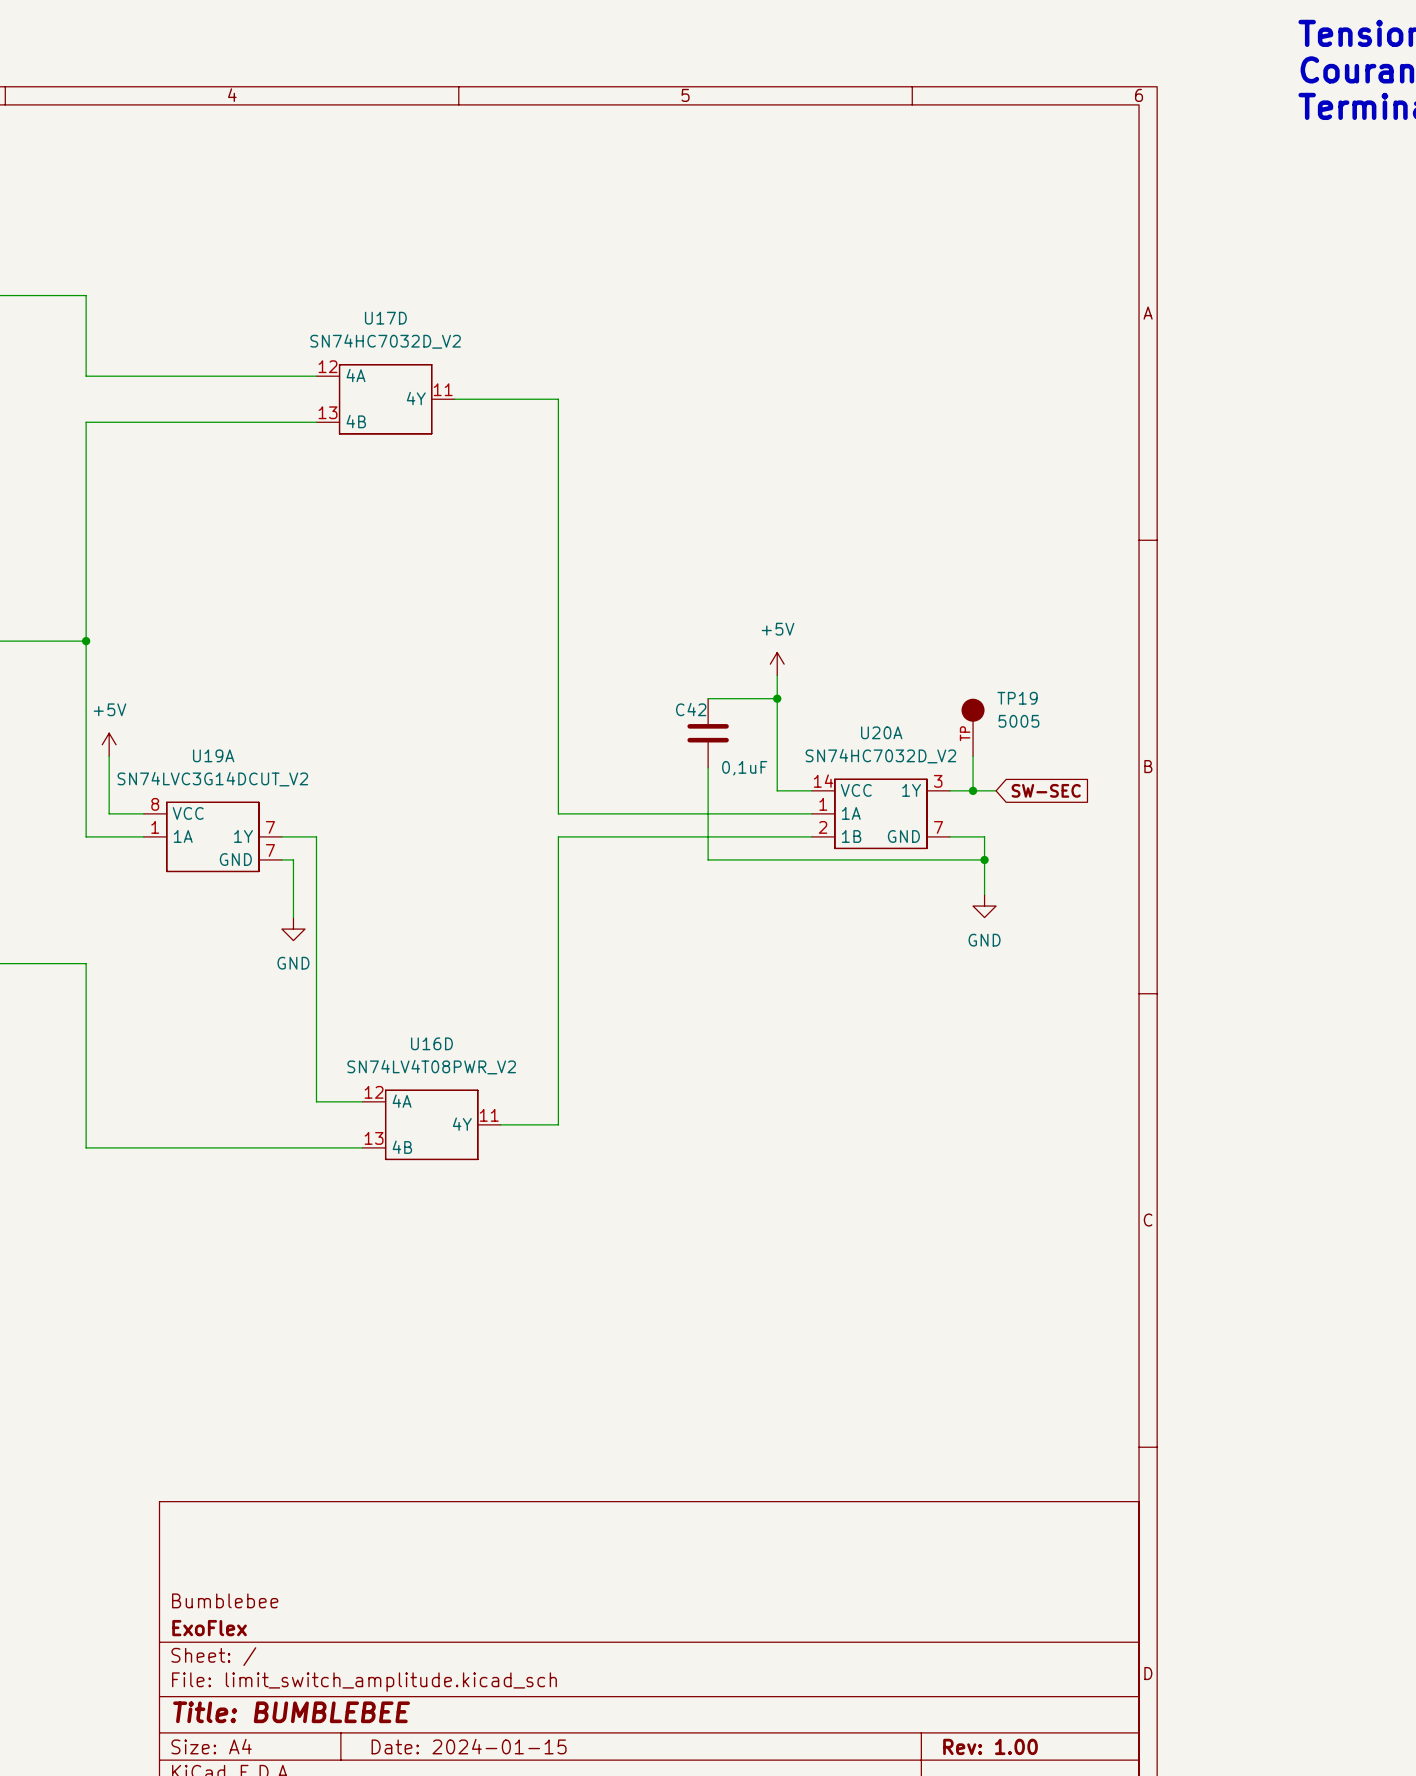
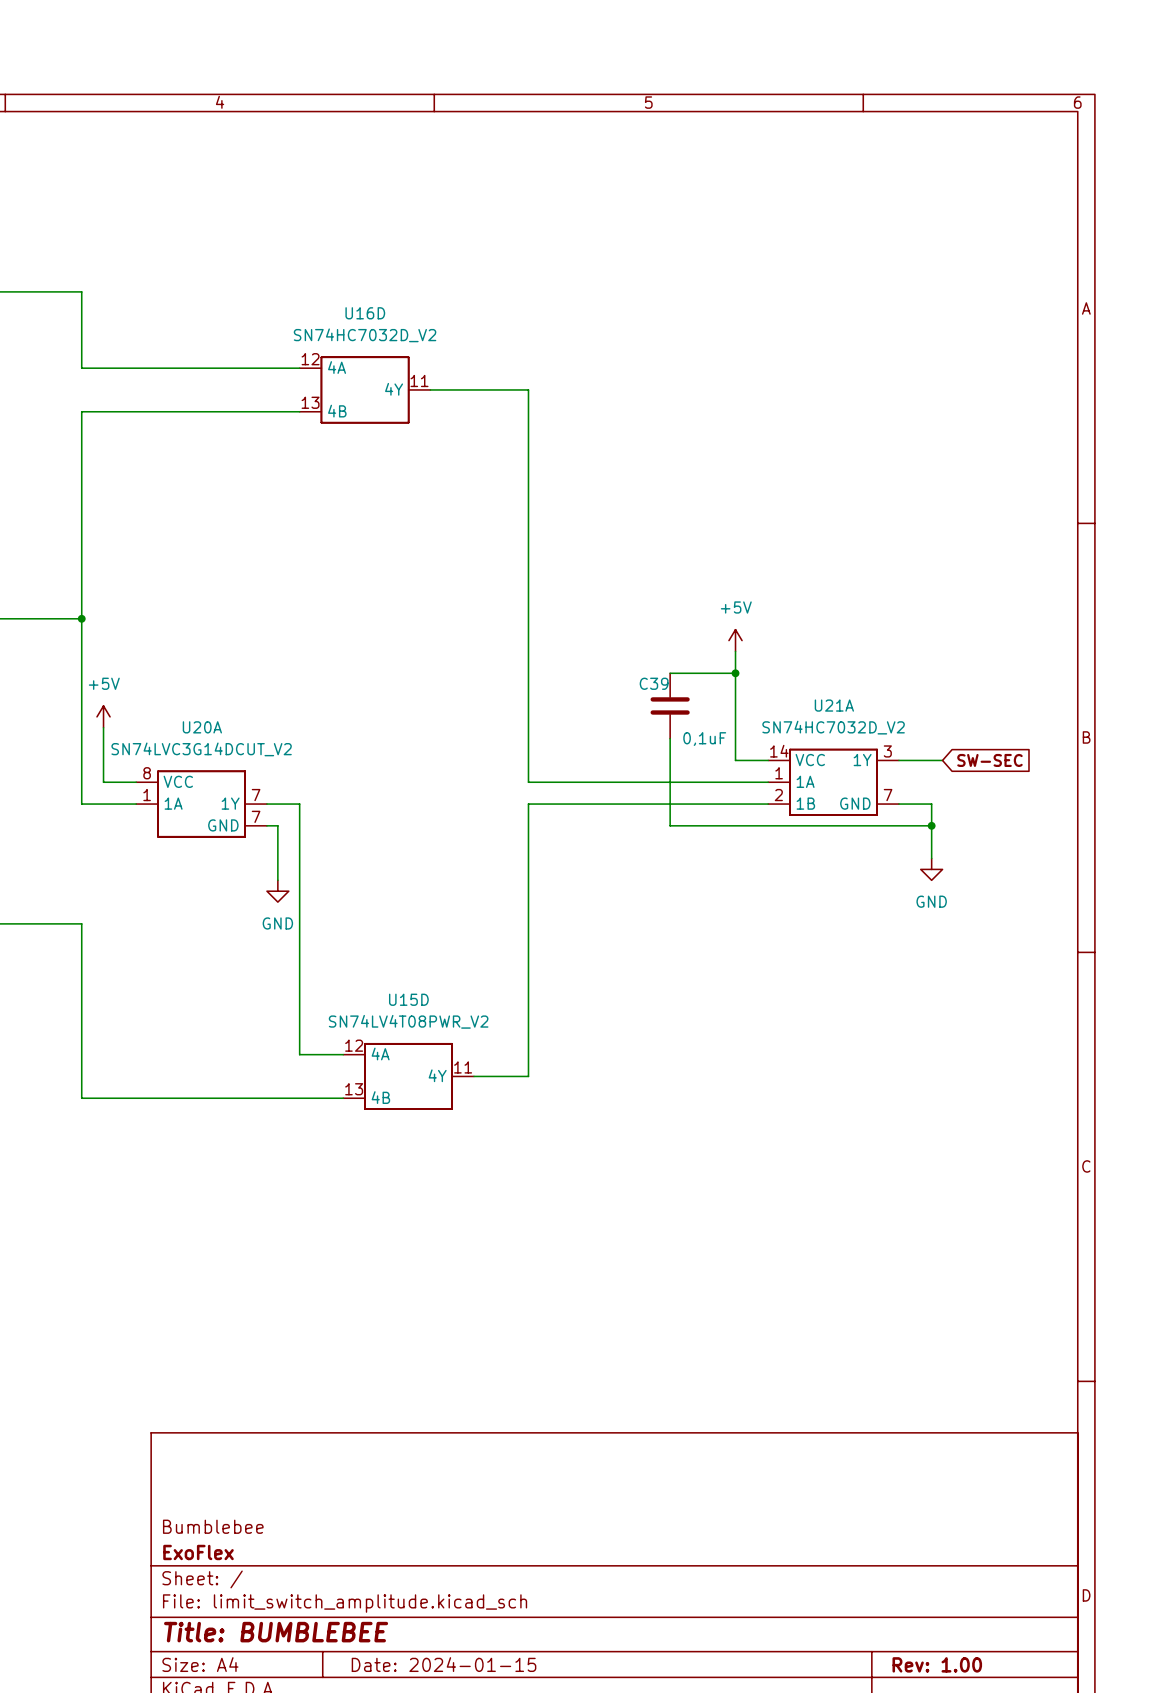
U17D name: U17D (385, 318) -> U16D (365, 313)
C42 name: C42 (691, 709) -> C39 (654, 683)
TP19: 5005 (973, 727) -> none
U20A name: U20A (881, 732) -> U21A (834, 705)
U19A name: U19A (213, 755) -> U20A (202, 727)
wire: (973, 756) (973, 790) -> none
junction: (973, 790) -> none
U16D name: U16D (431, 1043) -> U15D (408, 999)

